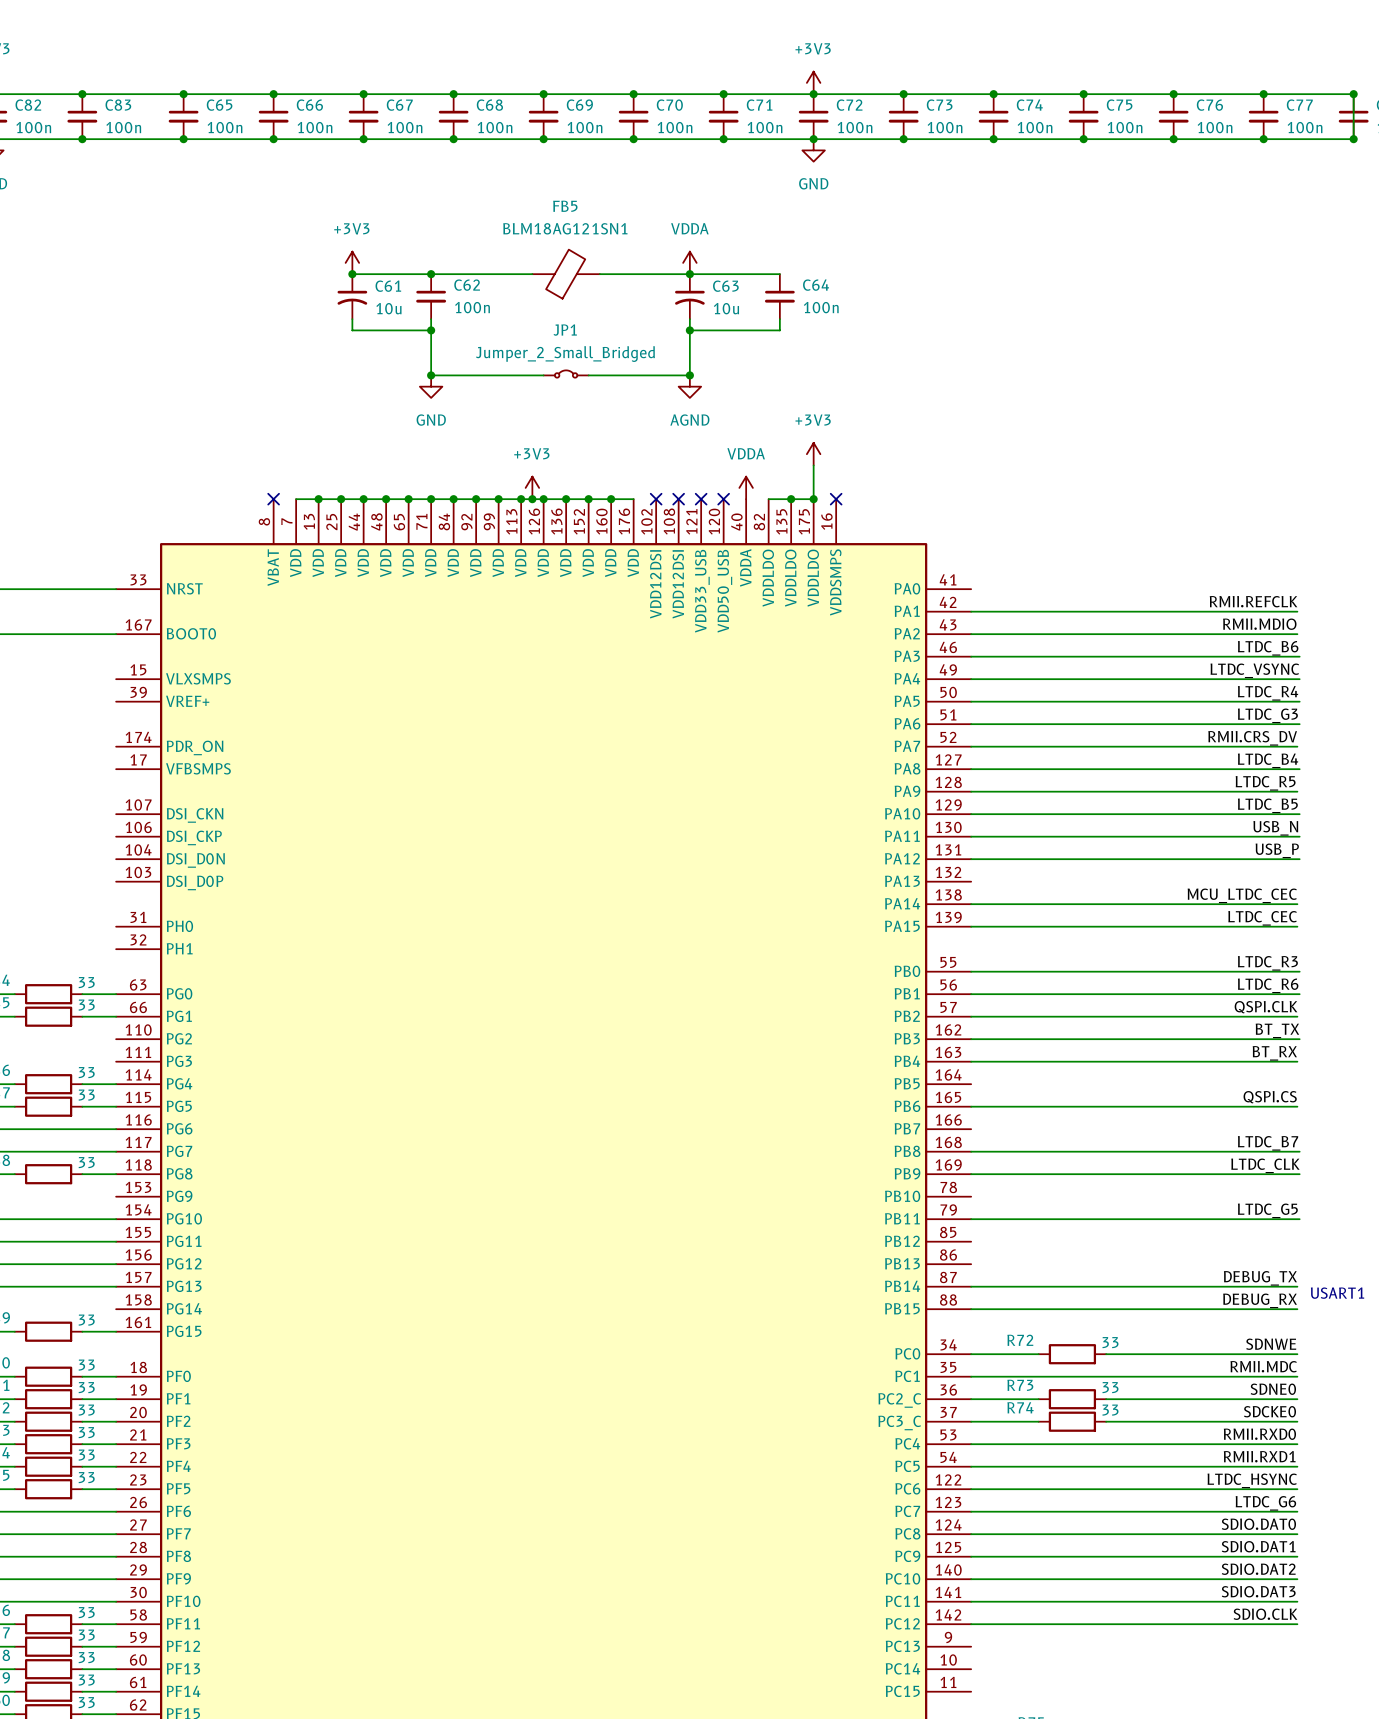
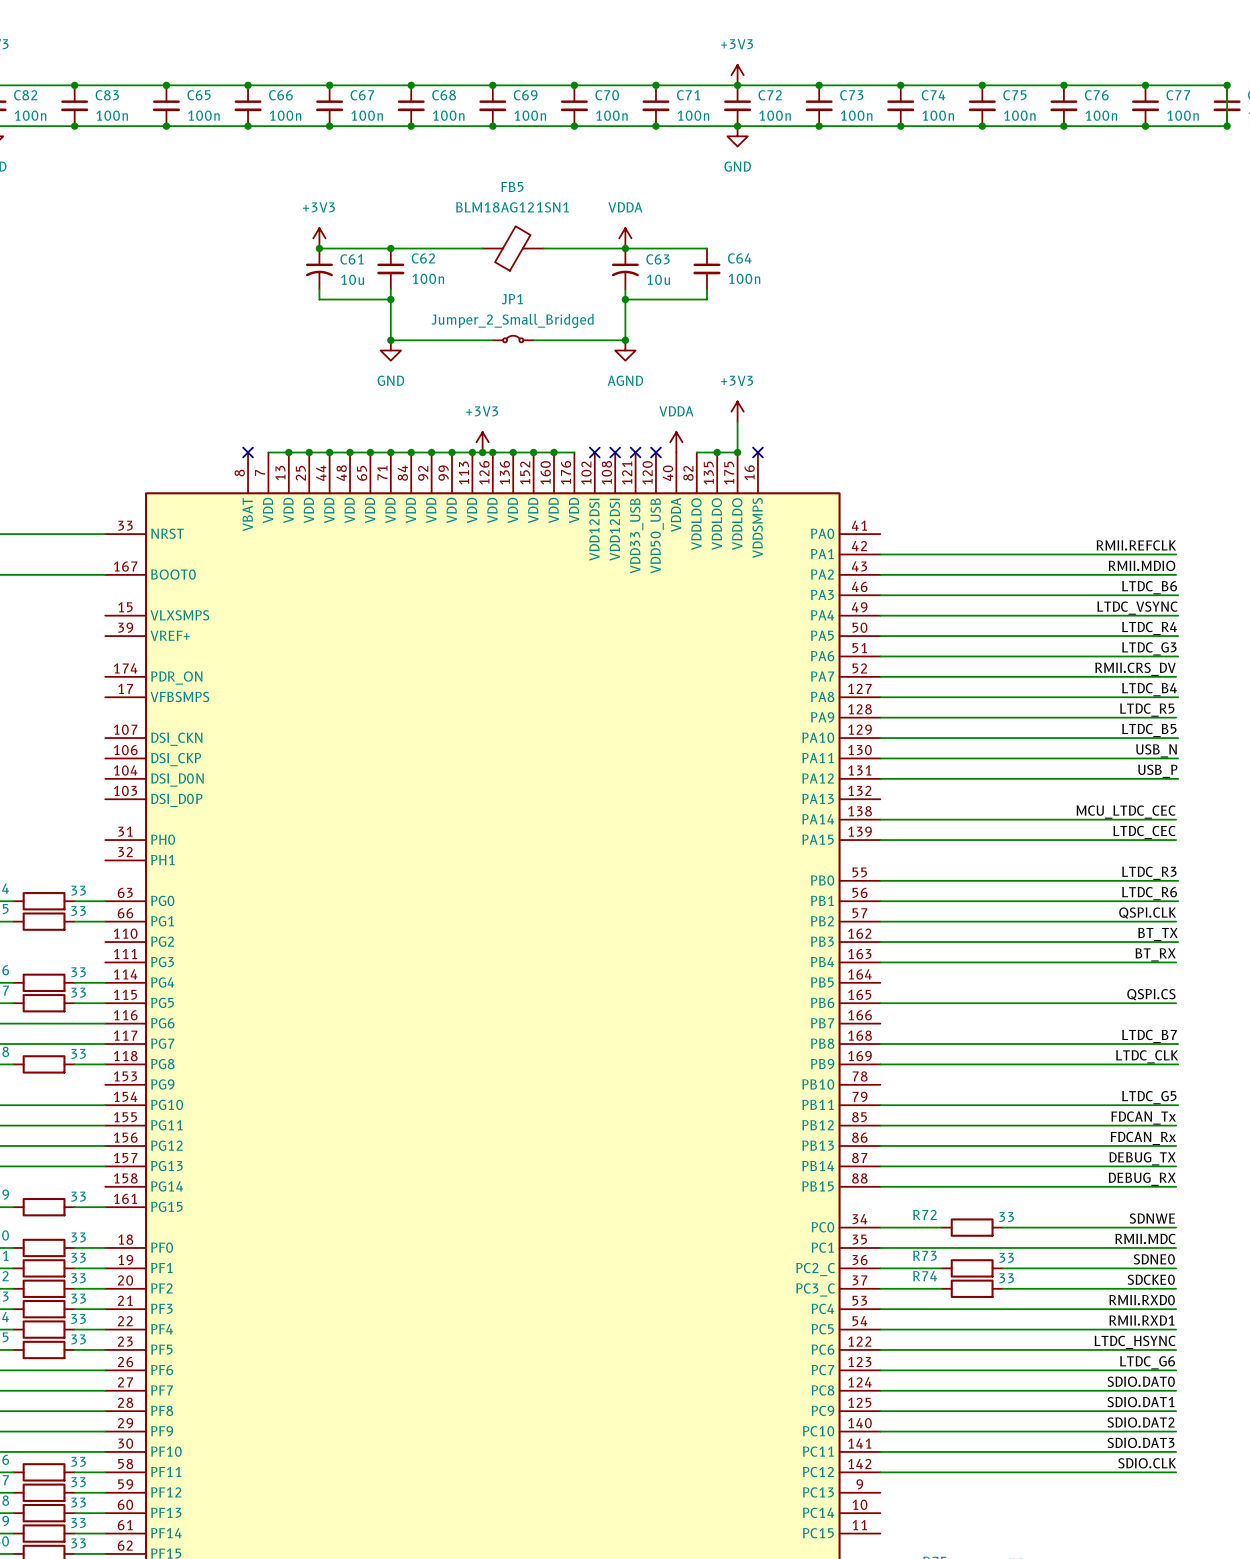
label: none -> FDCAN_Tx (1143, 1118)
wire: none -> (880, 1125) (1176, 1125)
label: none -> FDCAN_Rx (1143, 1138)
wire: none -> (880, 1146) (1176, 1146)
text: USART1 (1337, 1293) -> none

